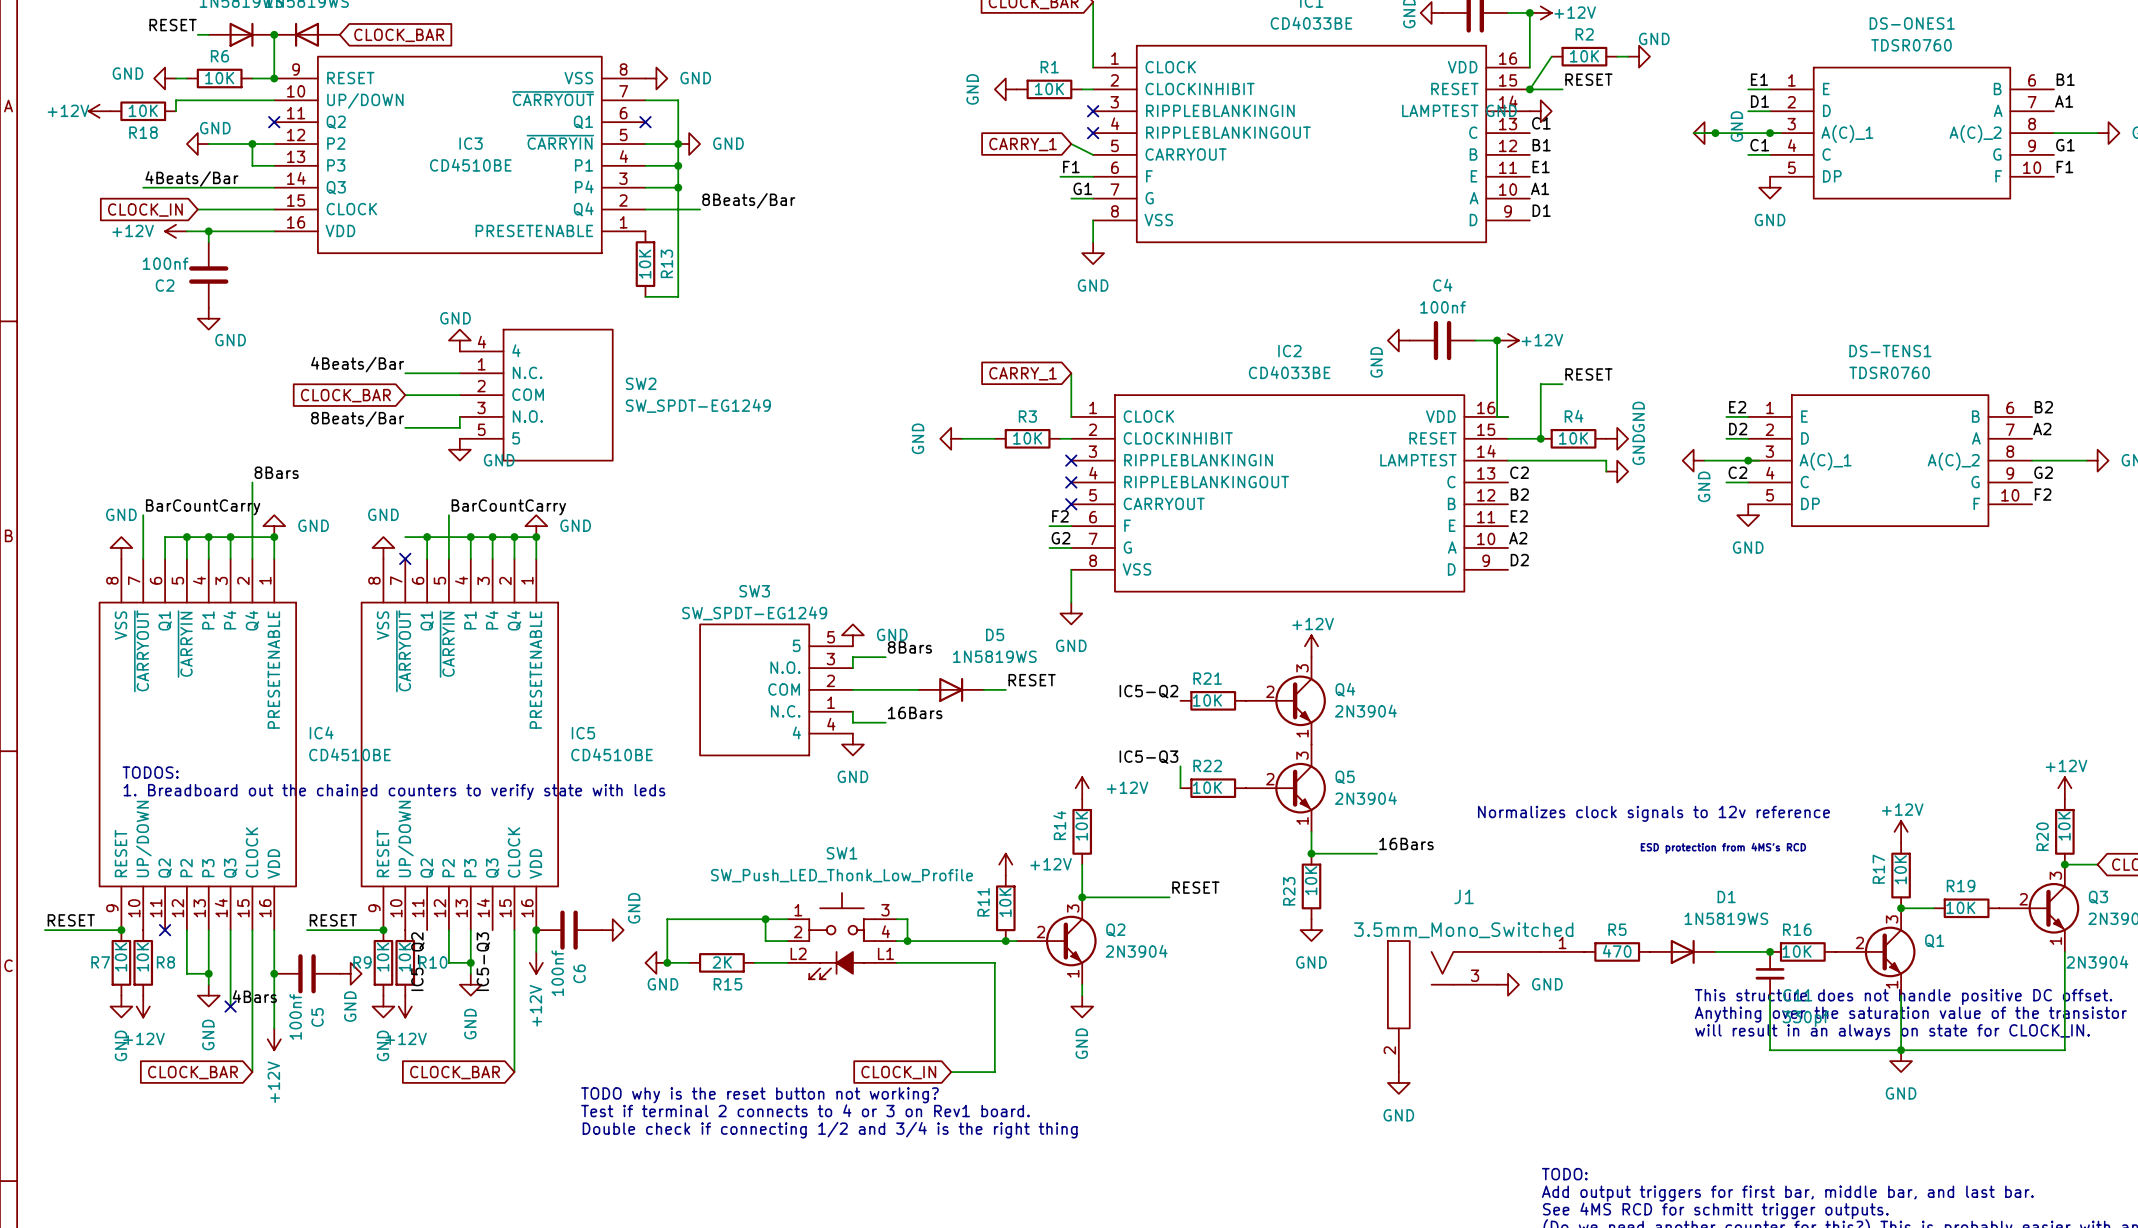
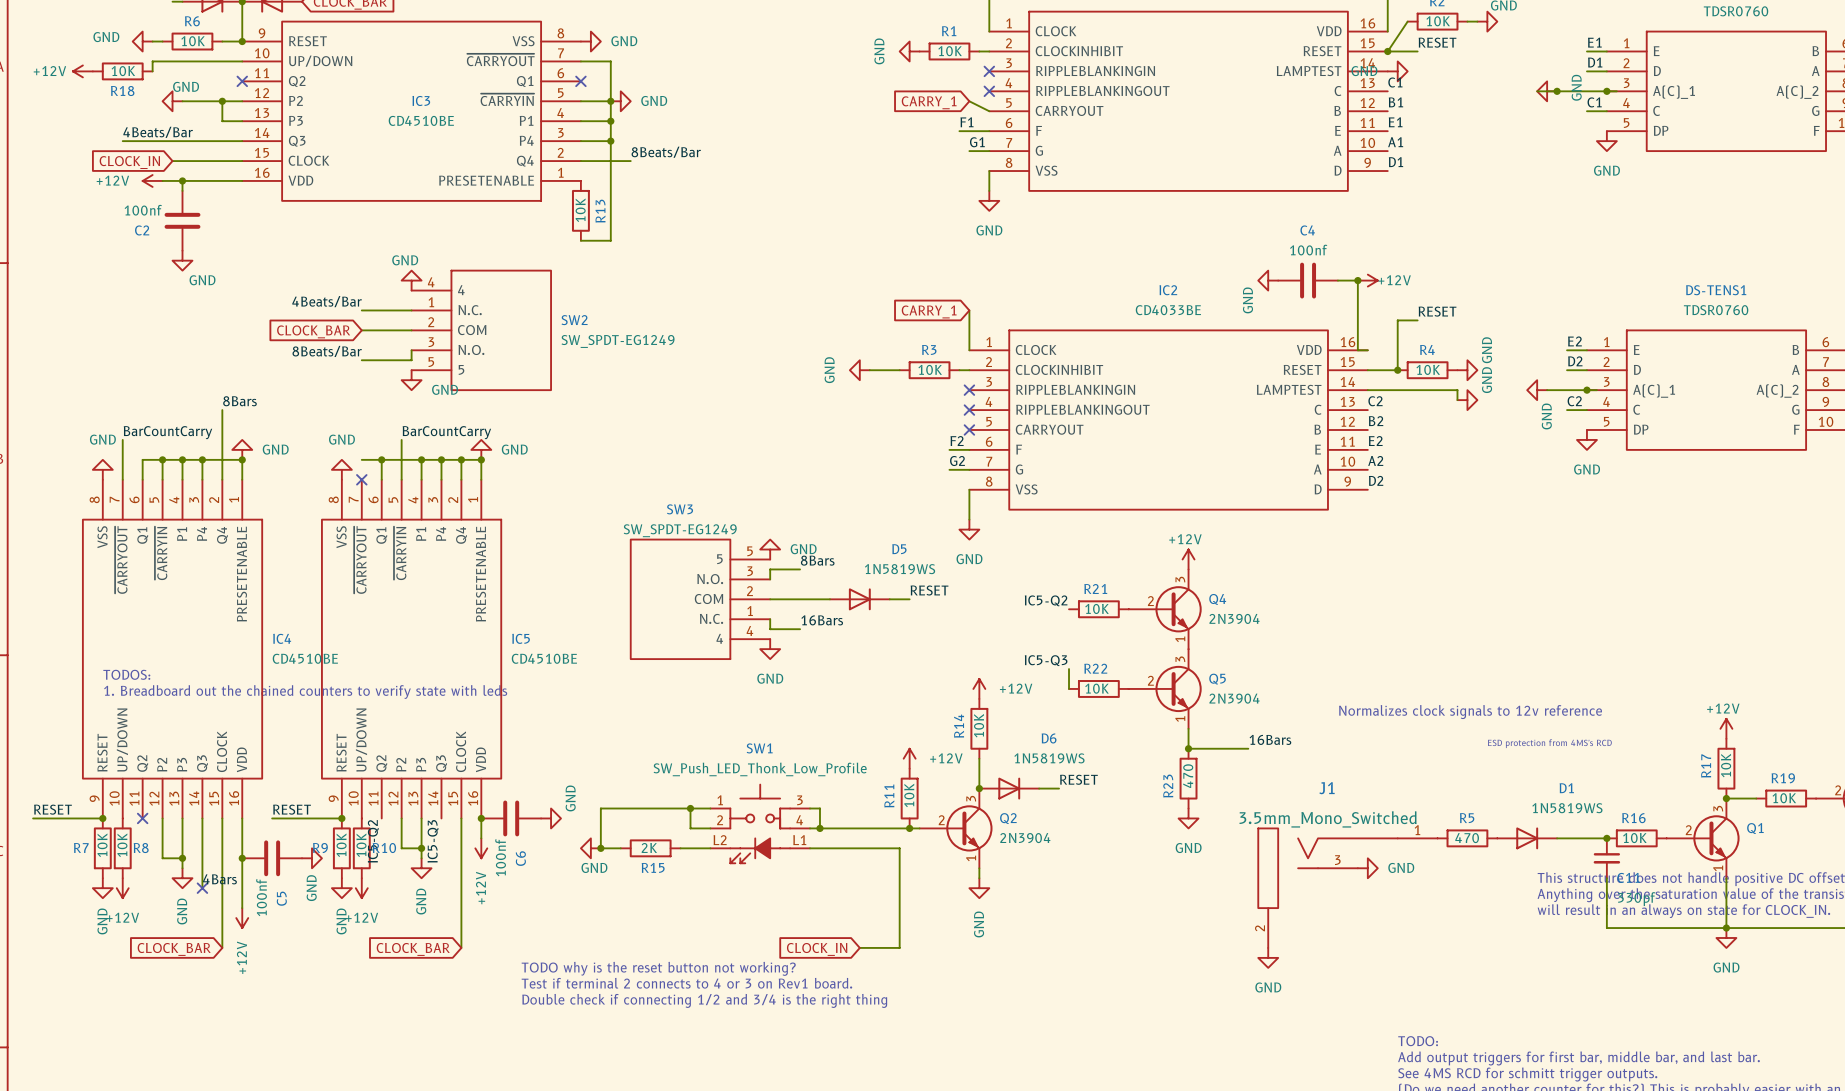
R23 value: 10K (1311, 880) -> 470 (1188, 776)
D6: none -> 1N5819WS (1009, 788)

